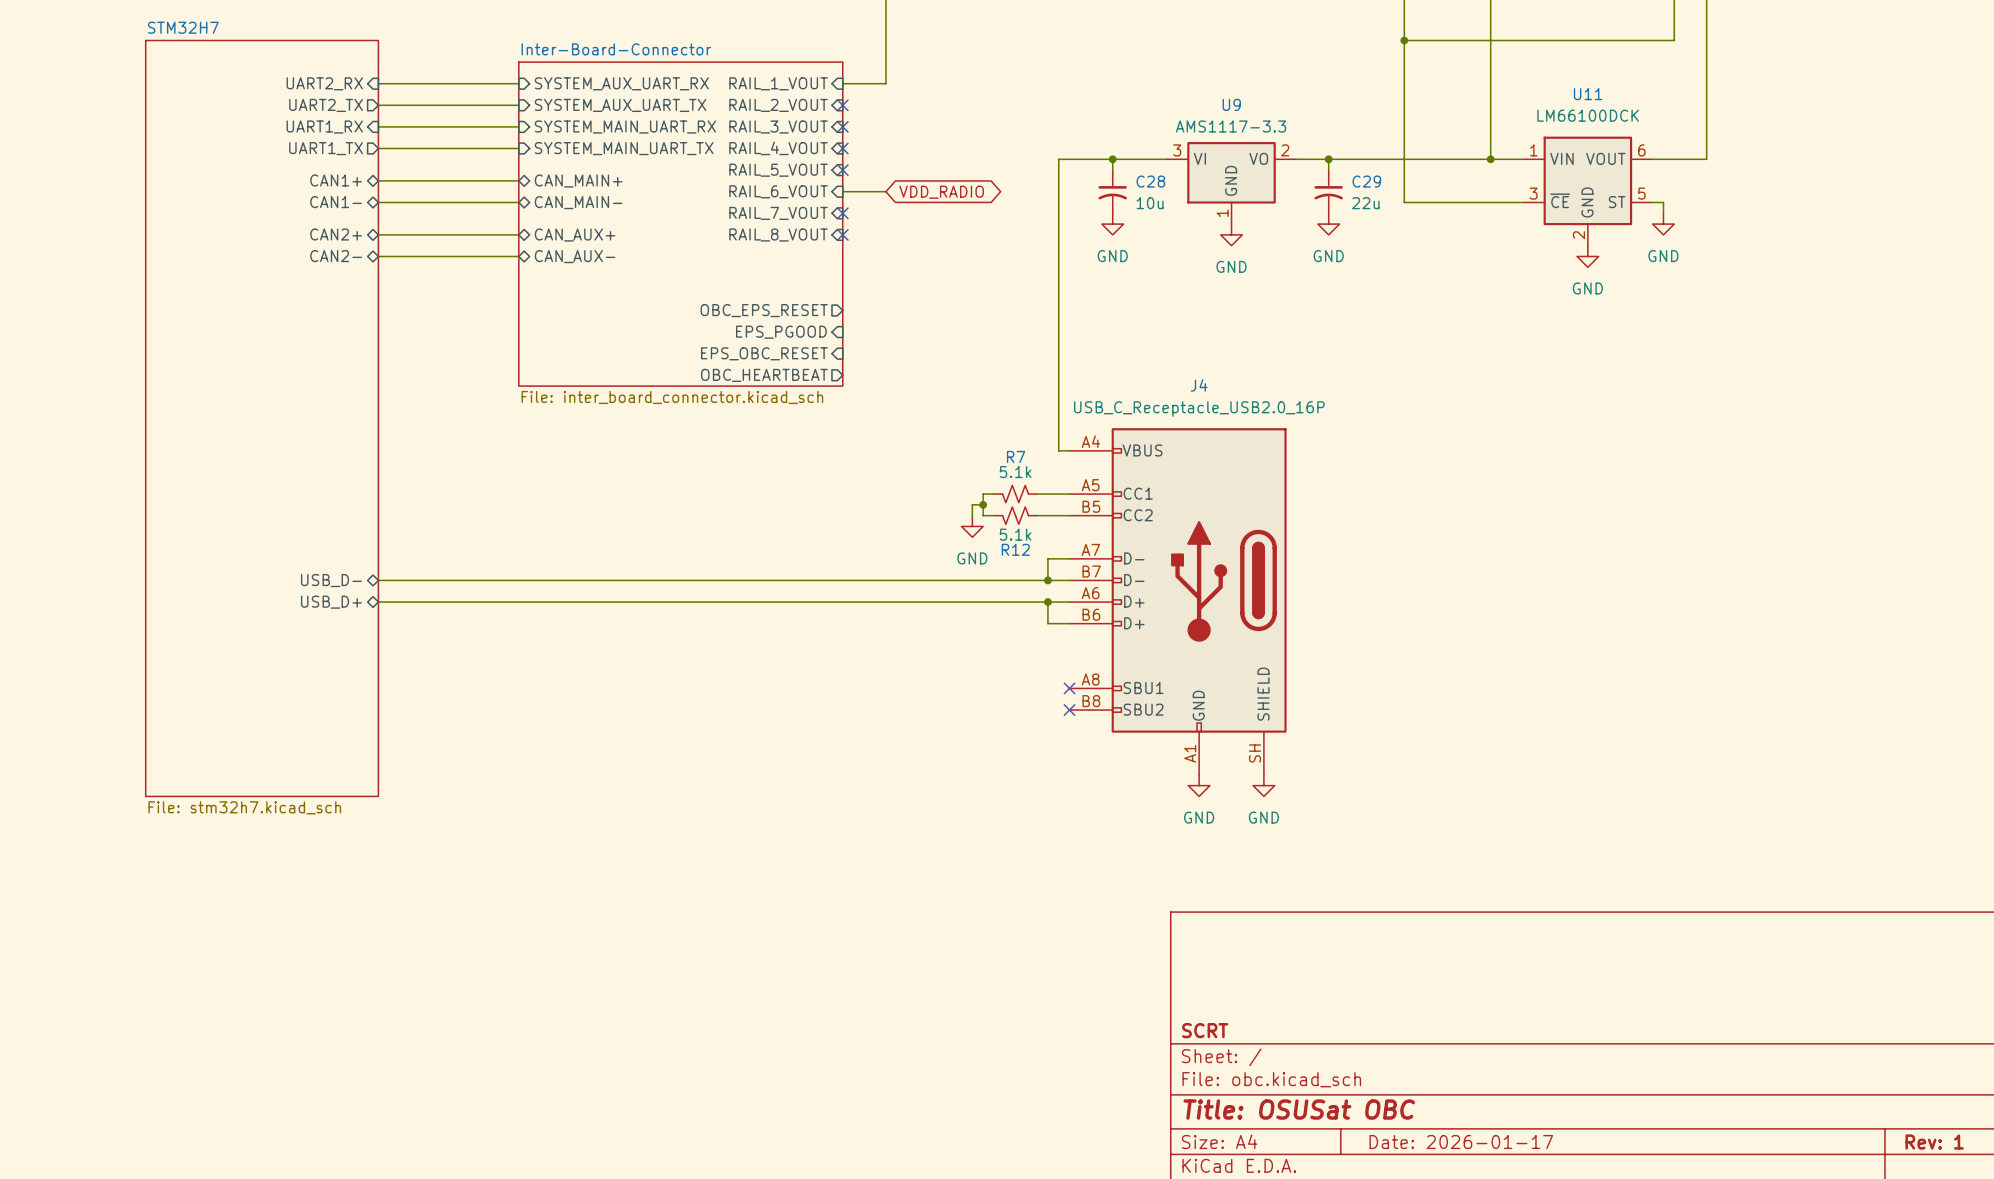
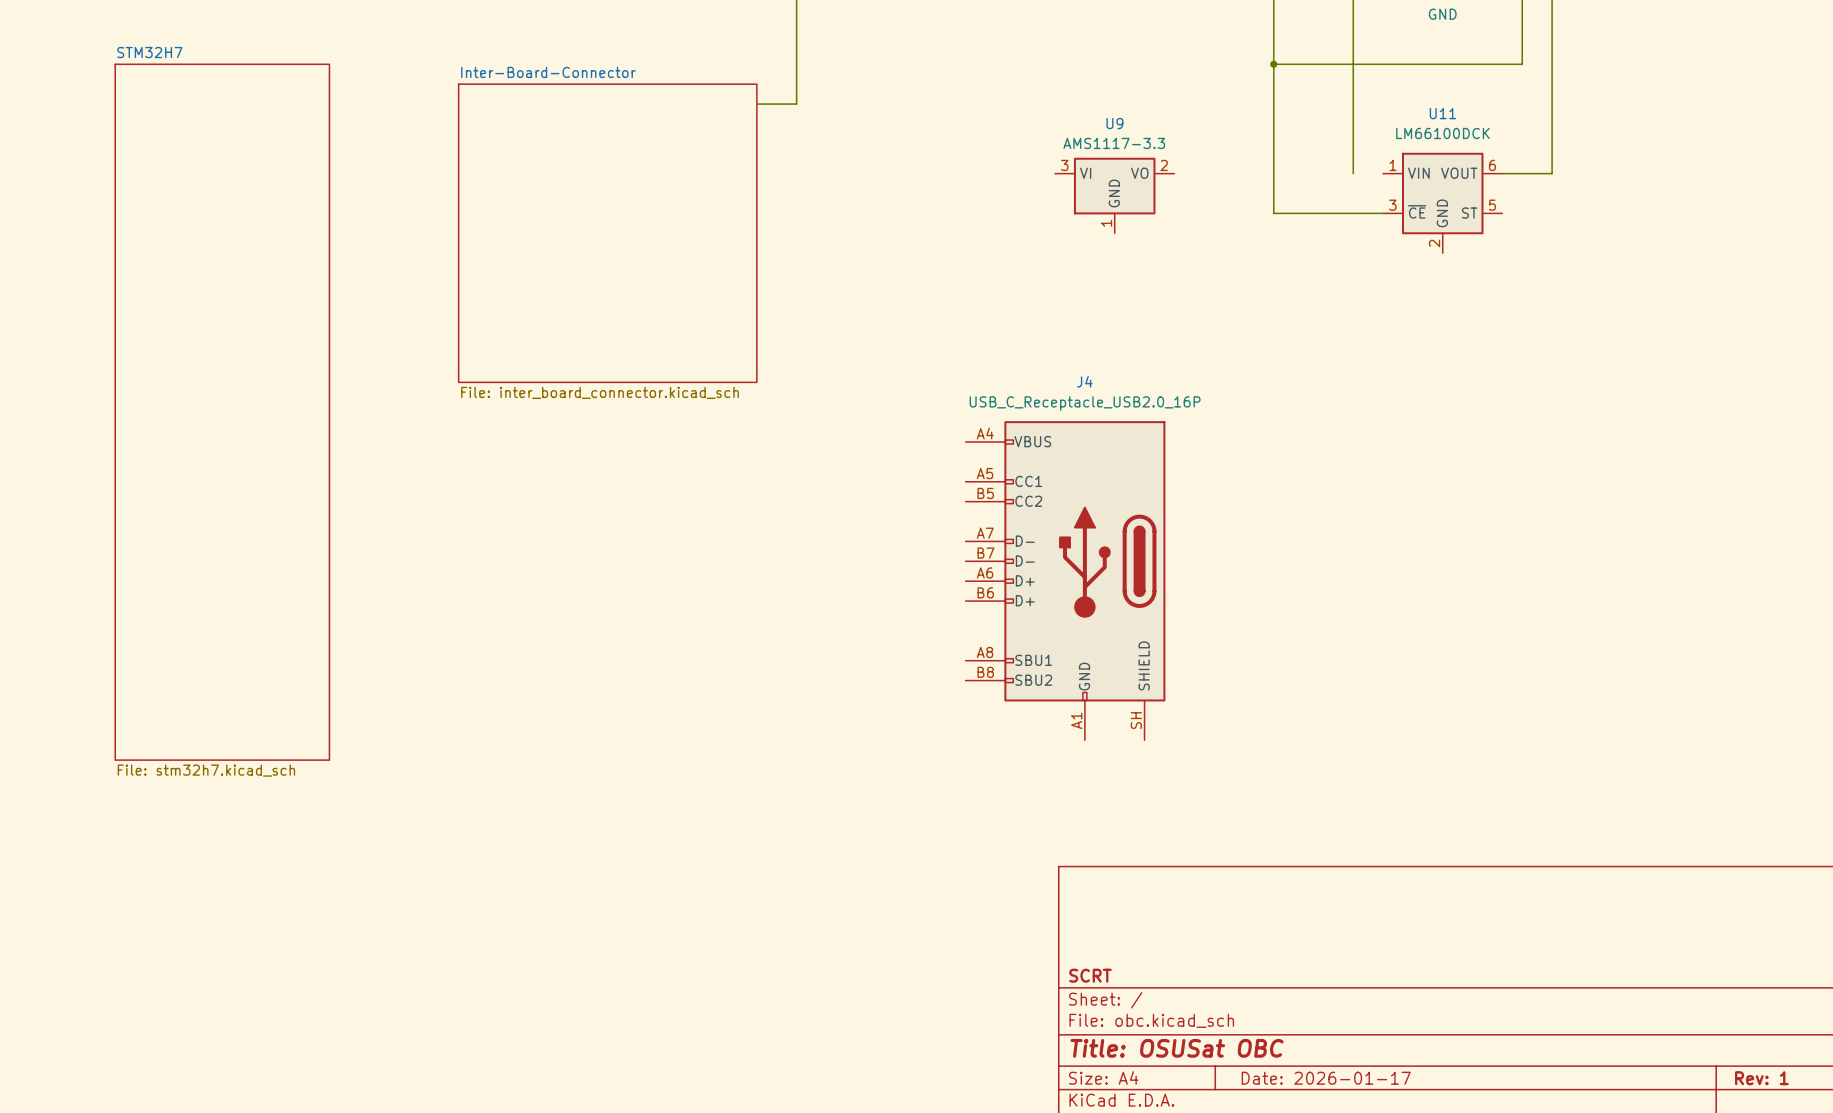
sheet pin: UART2_RX (324, 83) -> none
wire: (378, 83) (518, 83) -> none
sheet pin: SYSTEM_AUX_UART_RX (621, 83) -> none
sheet pin: RAIL_1_VOUT (778, 83) -> none
sheet pin: UART2_TX (326, 105) -> none
wire: (378, 105) (518, 105) -> none
sheet pin: SYSTEM_AUX_UART_TX (620, 105) -> none
sheet pin: RAIL_2_VOUT (778, 105) -> none
no-connect mark: (842, 105) -> none
wire: (378, 126) (518, 126) -> none
no-connect mark: (842, 126) -> none
sheet pin: UART1_RX (324, 127) -> none
sheet pin: SYSTEM_MAIN_UART_RX (625, 127) -> none
sheet pin: RAIL_3_VOUT (778, 127) -> none
sheet pin: UART1_TX (326, 148) -> none
wire: (378, 148) (518, 148) -> none
sheet pin: SYSTEM_MAIN_UART_TX (624, 148) -> none
sheet pin: RAIL_4_VOUT (778, 148) -> none
no-connect mark: (842, 148) -> none
wire: (1112, 159) (1112, 170) -> none
junction: (1112, 159) -> none
wire: (1166, 159) (1058, 159) (1058, 450) (1069, 450) -> none
wire: (1296, 159) (1523, 159) -> none
wire: (1328, 159) (1328, 170) -> none
junction: (1328, 159) -> none
junction: (1490, 159) -> none
sheet pin: RAIL_5_VOUT (778, 170) -> none
no-connect mark: (842, 170) -> none
sheet pin: CAN1+ (336, 180) -> none
wire: (378, 180) (518, 180) -> none
sheet pin: CAN_MAIN+ (578, 181) -> none
sheet pin: RAIL_6_VOUT (778, 191) -> none
wire: (842, 191) (885, 191) -> none
C28: 10u (1112, 191) -> none
C29: 22u (1328, 191) -> none
global label: VDD_RADIO (941, 192) -> none
sheet pin: CAN1- (336, 202) -> none
wire: (378, 202) (518, 202) -> none
sheet pin: CAN_MAIN- (578, 202) -> none
wire: (1652, 202) (1663, 202) (1663, 213) -> none
sheet pin: RAIL_7_VOUT (778, 213) -> none
no-connect mark: (842, 213) -> none
power symbol: GND (1112, 224) -> none
power symbol: GND (1328, 224) -> none
power symbol: GND (1663, 224) -> none
sheet pin: CAN2+ (336, 234) -> none
wire: (378, 234) (518, 234) -> none
no-connect mark: (842, 234) -> none
power symbol: GND (1231, 234) -> none
sheet pin: CAN_AUX+ (575, 235) -> none
sheet pin: RAIL_8_VOUT (778, 235) -> none
sheet pin: CAN2- (336, 256) -> none
wire: (378, 256) (518, 256) -> none
sheet pin: CAN_AUX- (575, 256) -> none
power symbol: GND (1587, 256) -> none
sheet pin: OBC_EPS_RESET (764, 310) -> none
sheet pin: EPS_PGOOD (781, 332) -> none
sheet pin: EPS_OBC_RESET (764, 353) -> none
sheet pin: OBC_HEARTBEAT (764, 375) -> none
wire: (993, 494) (983, 494) (983, 515) (993, 515) -> none
R7: 5.1k (1015, 494) -> none
wire: (1037, 494) (1069, 494) -> none
wire: (983, 504) (972, 504) (972, 515) -> none
junction: (983, 504) -> none
R12: 5.1k (1015, 515) -> none
wire: (1037, 515) (1069, 515) -> none
power symbol: GND (972, 526) -> none
wire: (1069, 558) (1047, 558) (1047, 580) -> none
sheet pin: USB_D- (331, 580) -> none
wire: (378, 580) (1069, 580) -> none
junction: (1047, 580) -> none
sheet pin: USB_D+ (331, 602) -> none
wire: (378, 602) (1069, 602) -> none
wire: (1047, 602) (1047, 623) (1069, 623) -> none
junction: (1047, 602) -> none
no-connect mark: (1069, 688) -> none
no-connect mark: (1069, 710) -> none
power symbol: GND (1199, 785) -> none
power symbol: GND (1263, 785) -> none

